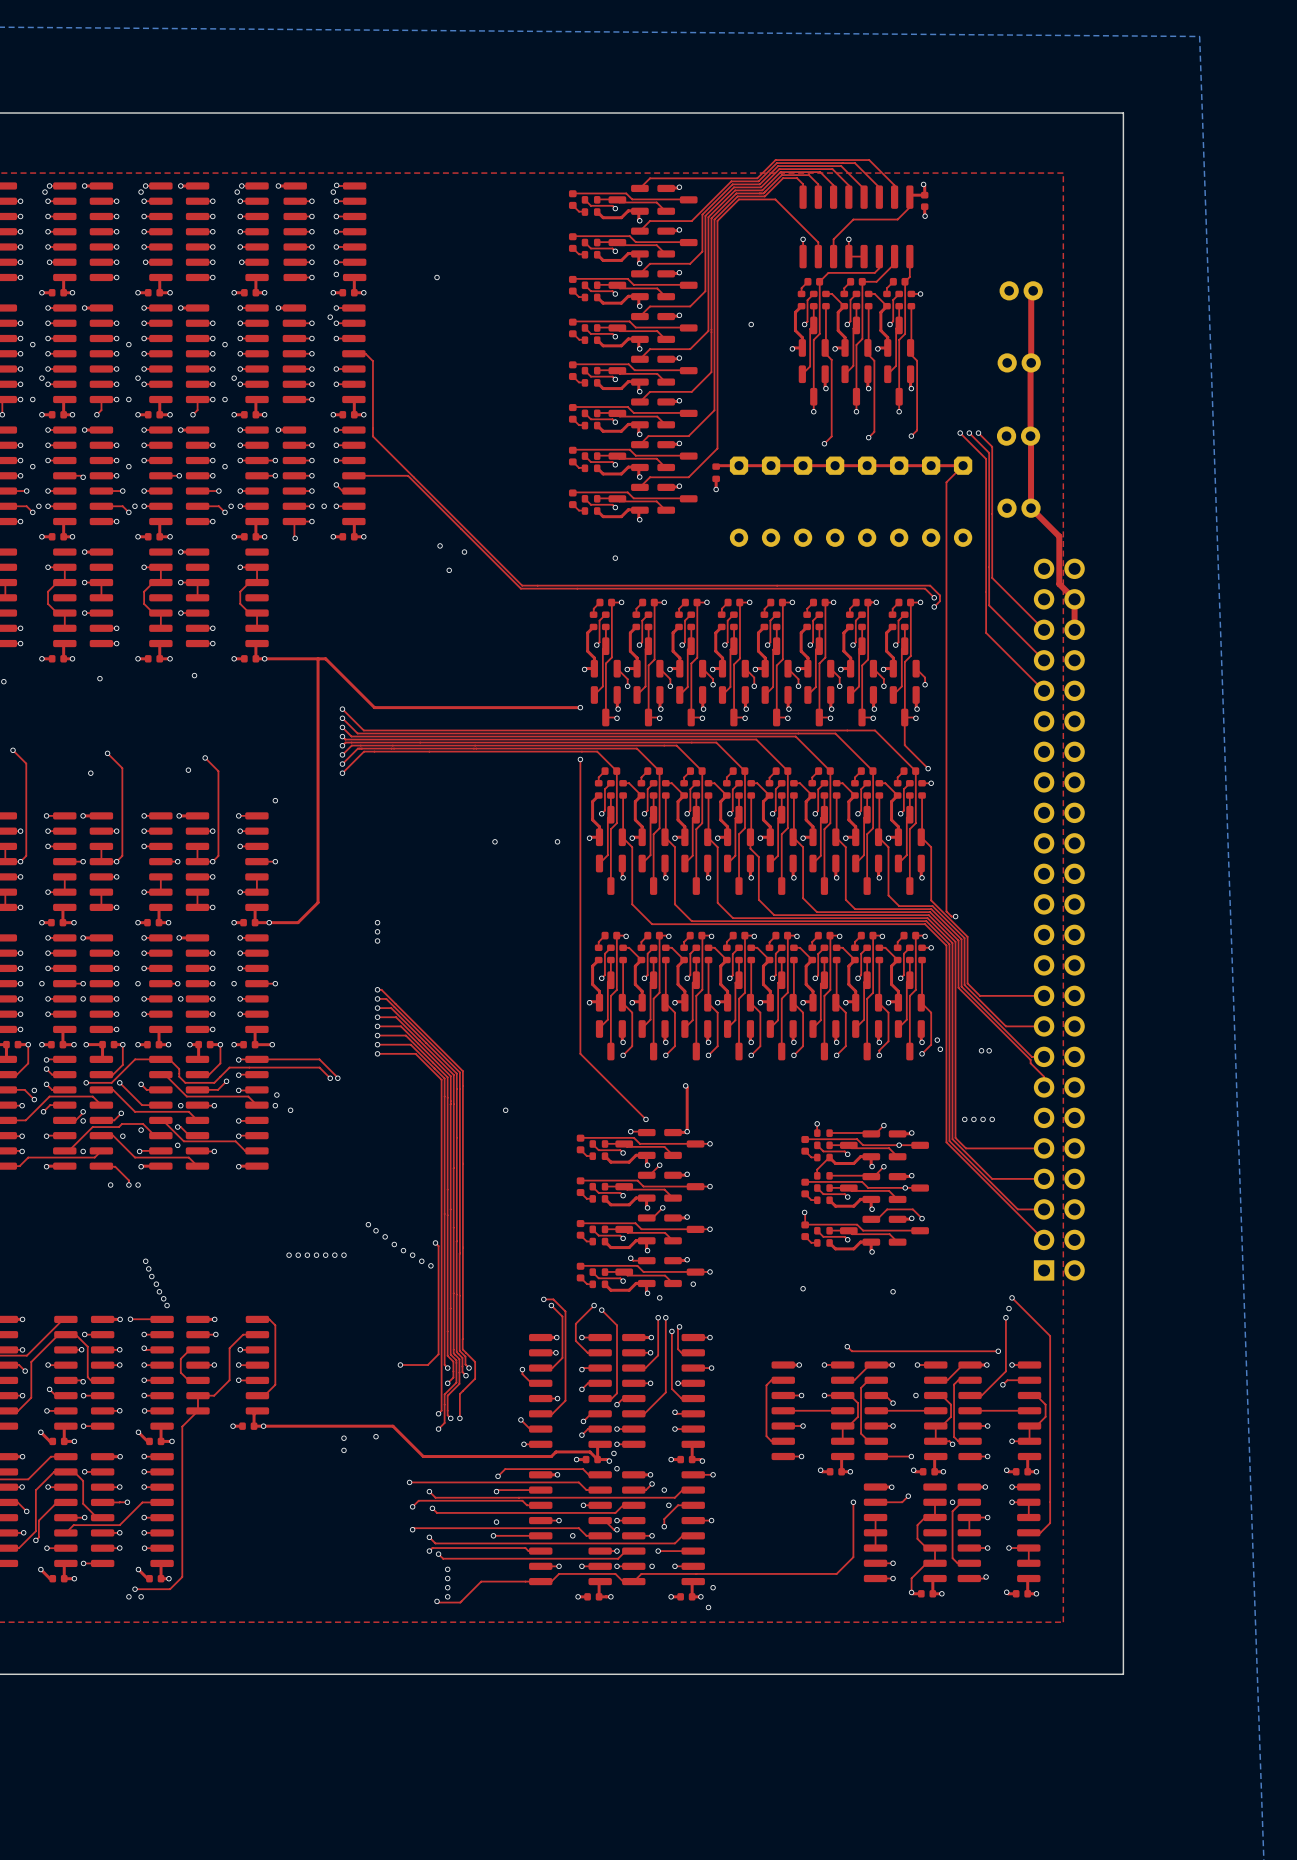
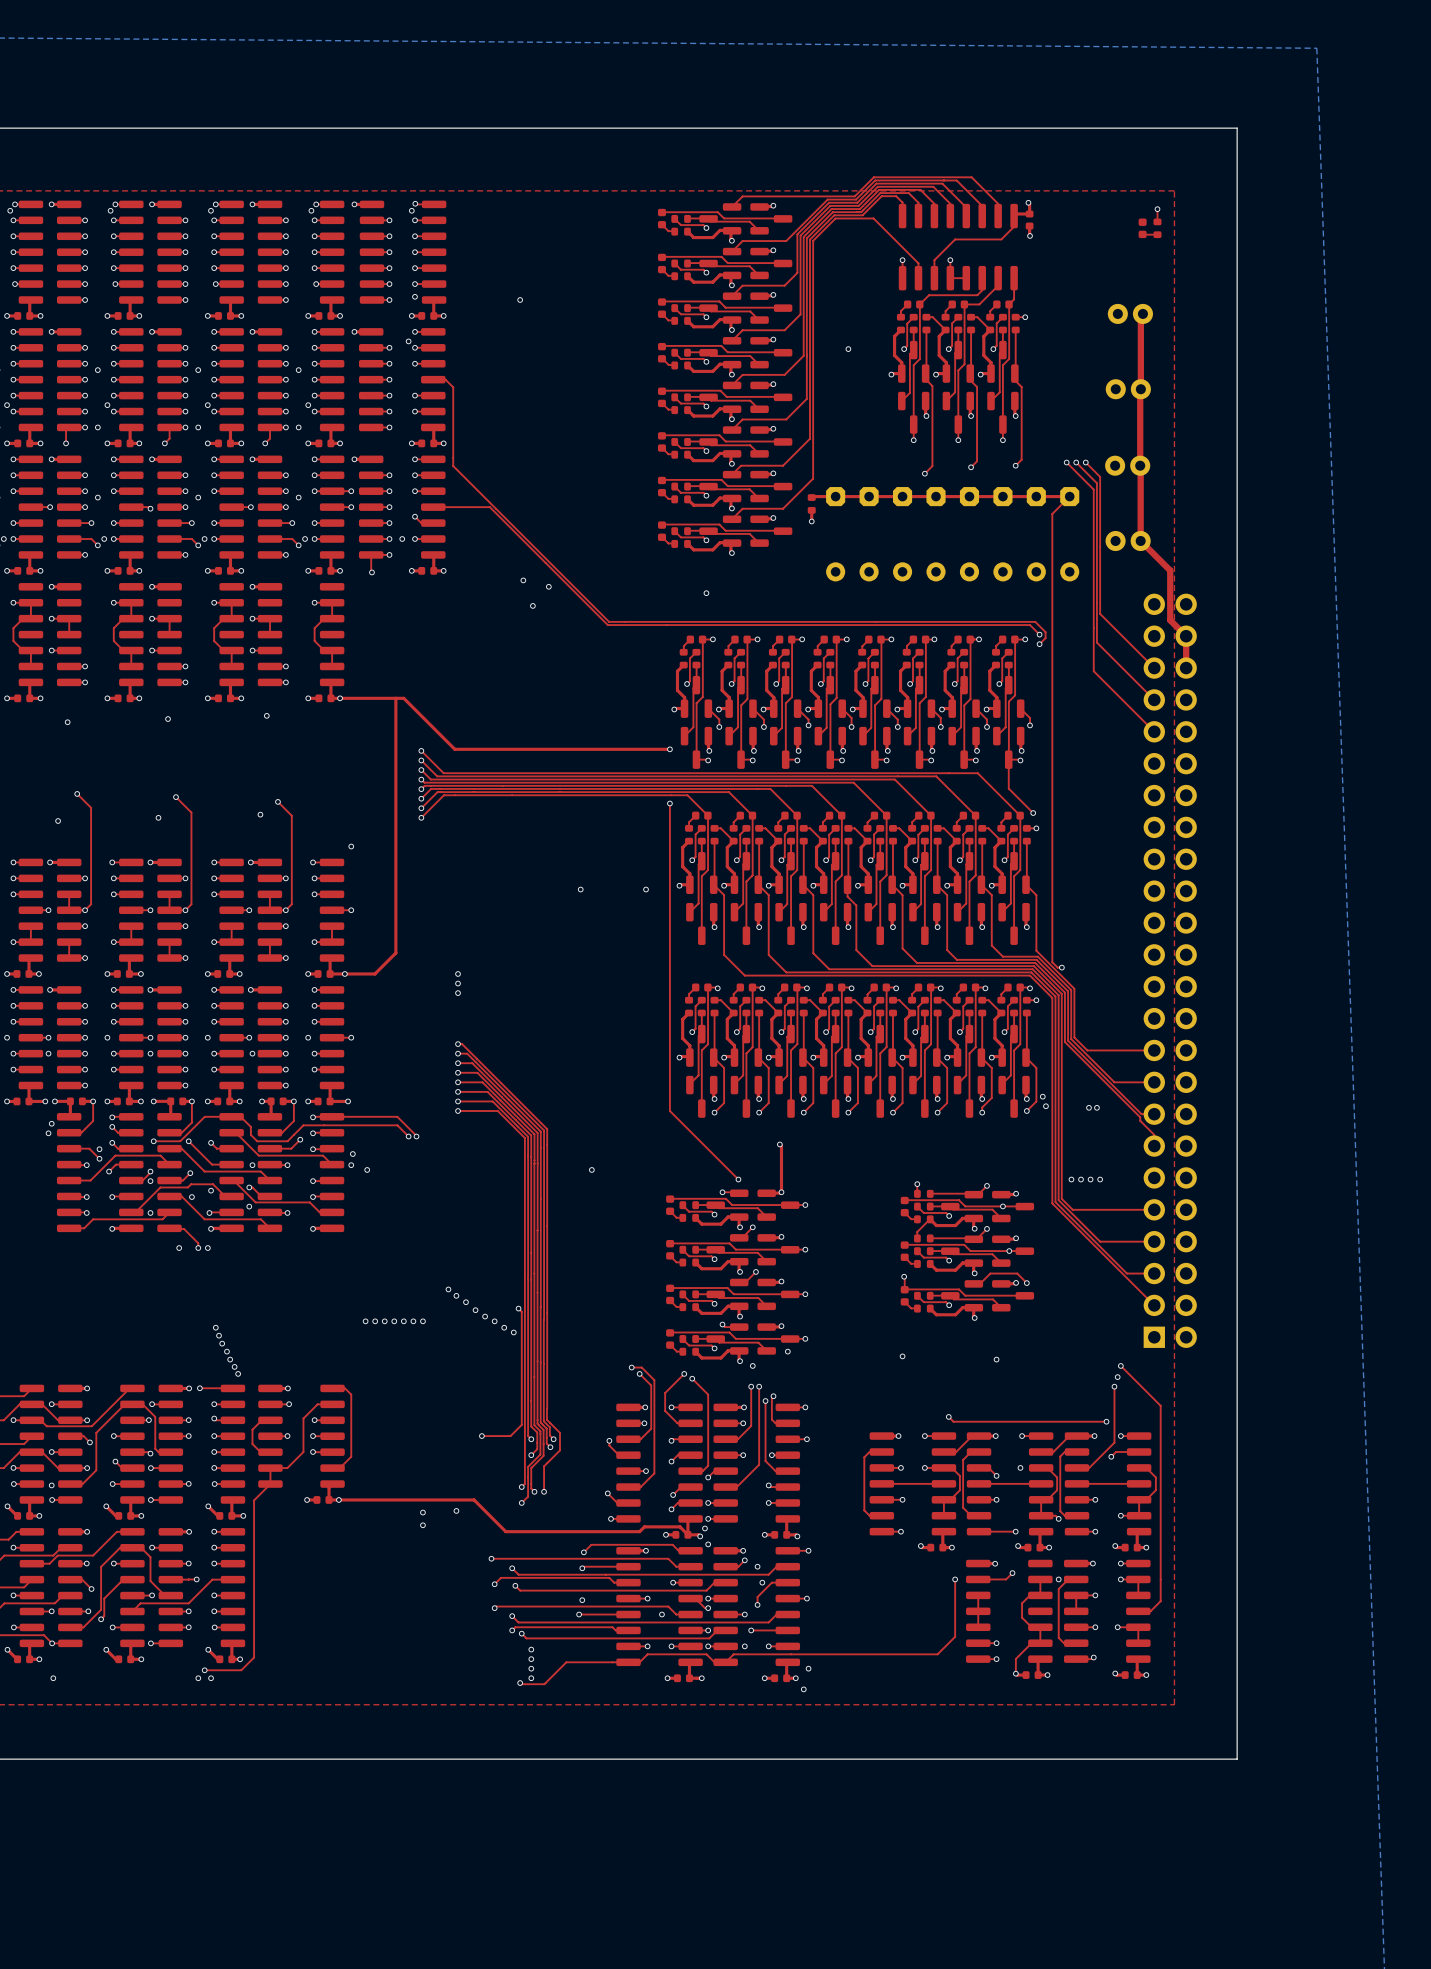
top track: none -> (1157, 209) (1157, 221)
via: none -> (1157, 209)
part: none -> (1142, 228)
part: none -> (1157, 228)
top track: none -> (1142, 234) (1157, 234)

